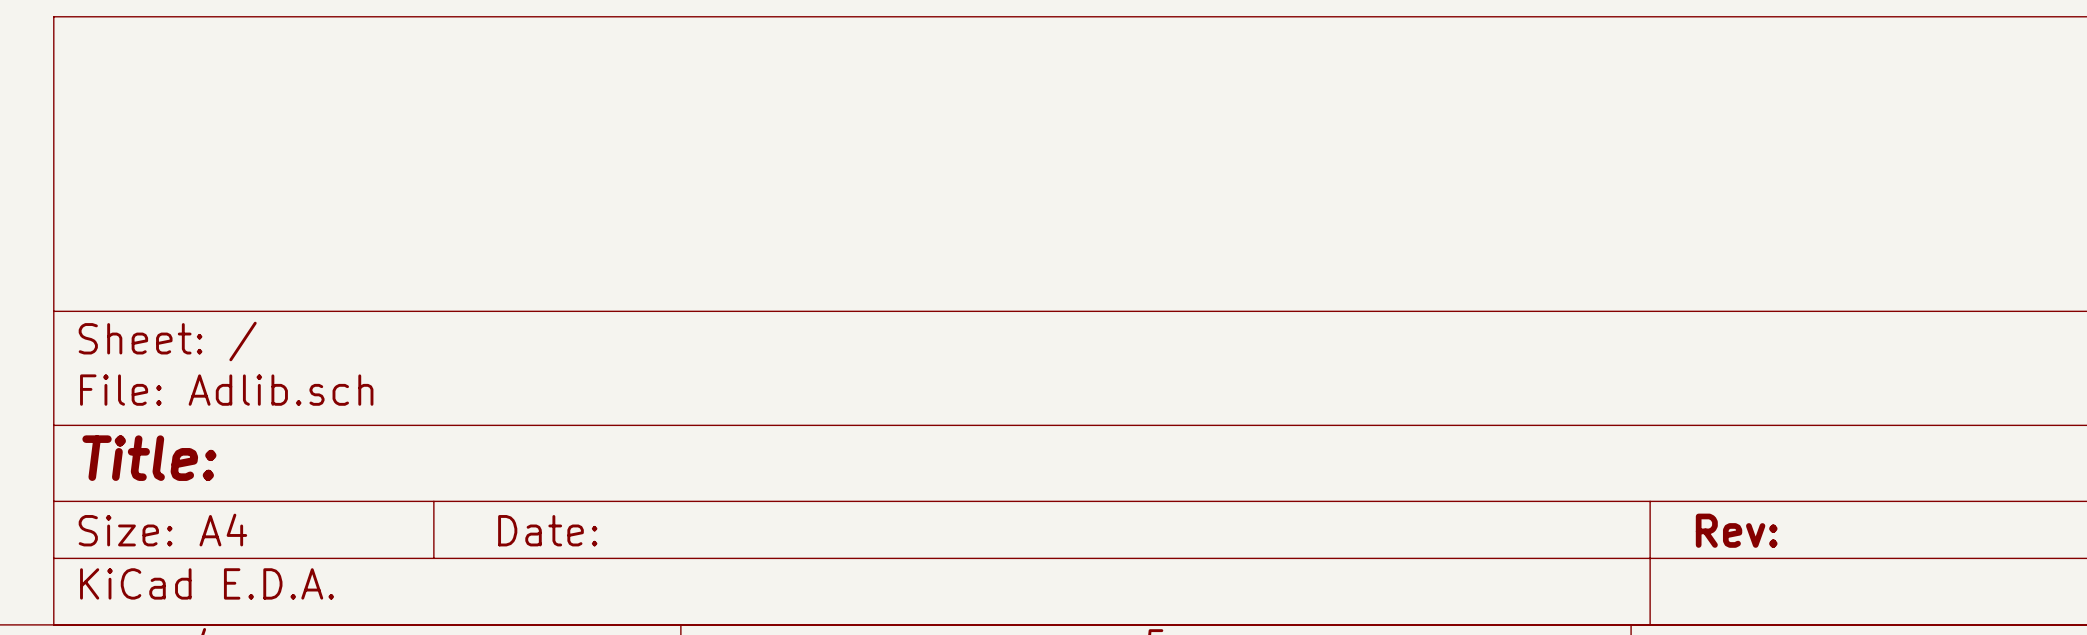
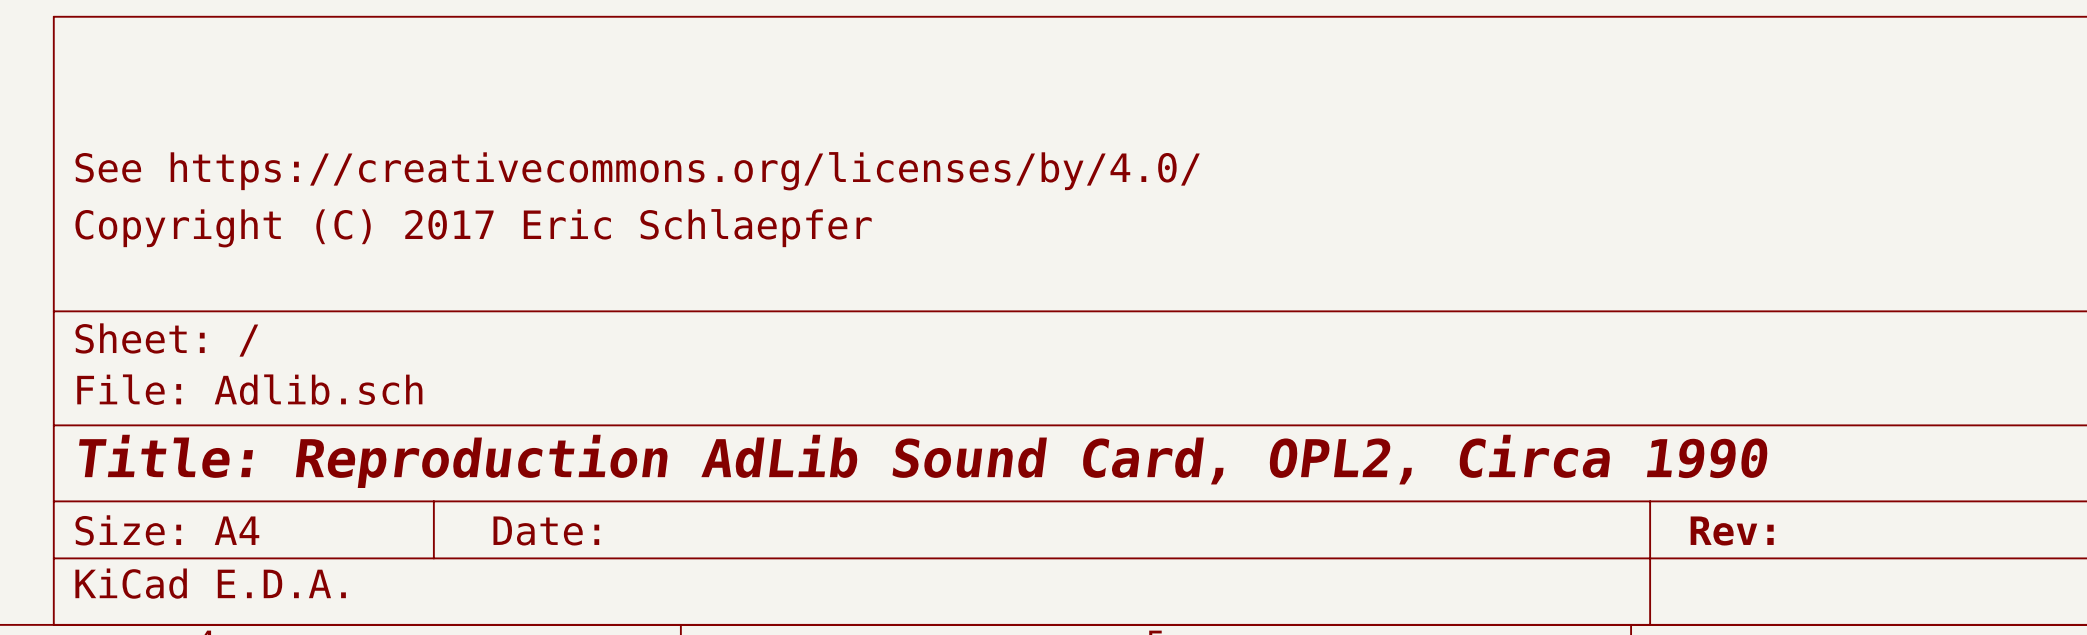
title block: none -> See https://creativecommons.org/licenses/by/4.0/ (637, 171)
title block: none -> Copyright (C) 2017 Eric Schlaepfer (473, 228)
title block: Title: (149, 458) -> Title: Reproduction AdLib Sound Card, OPL2, Circa 1990 (923, 461)

